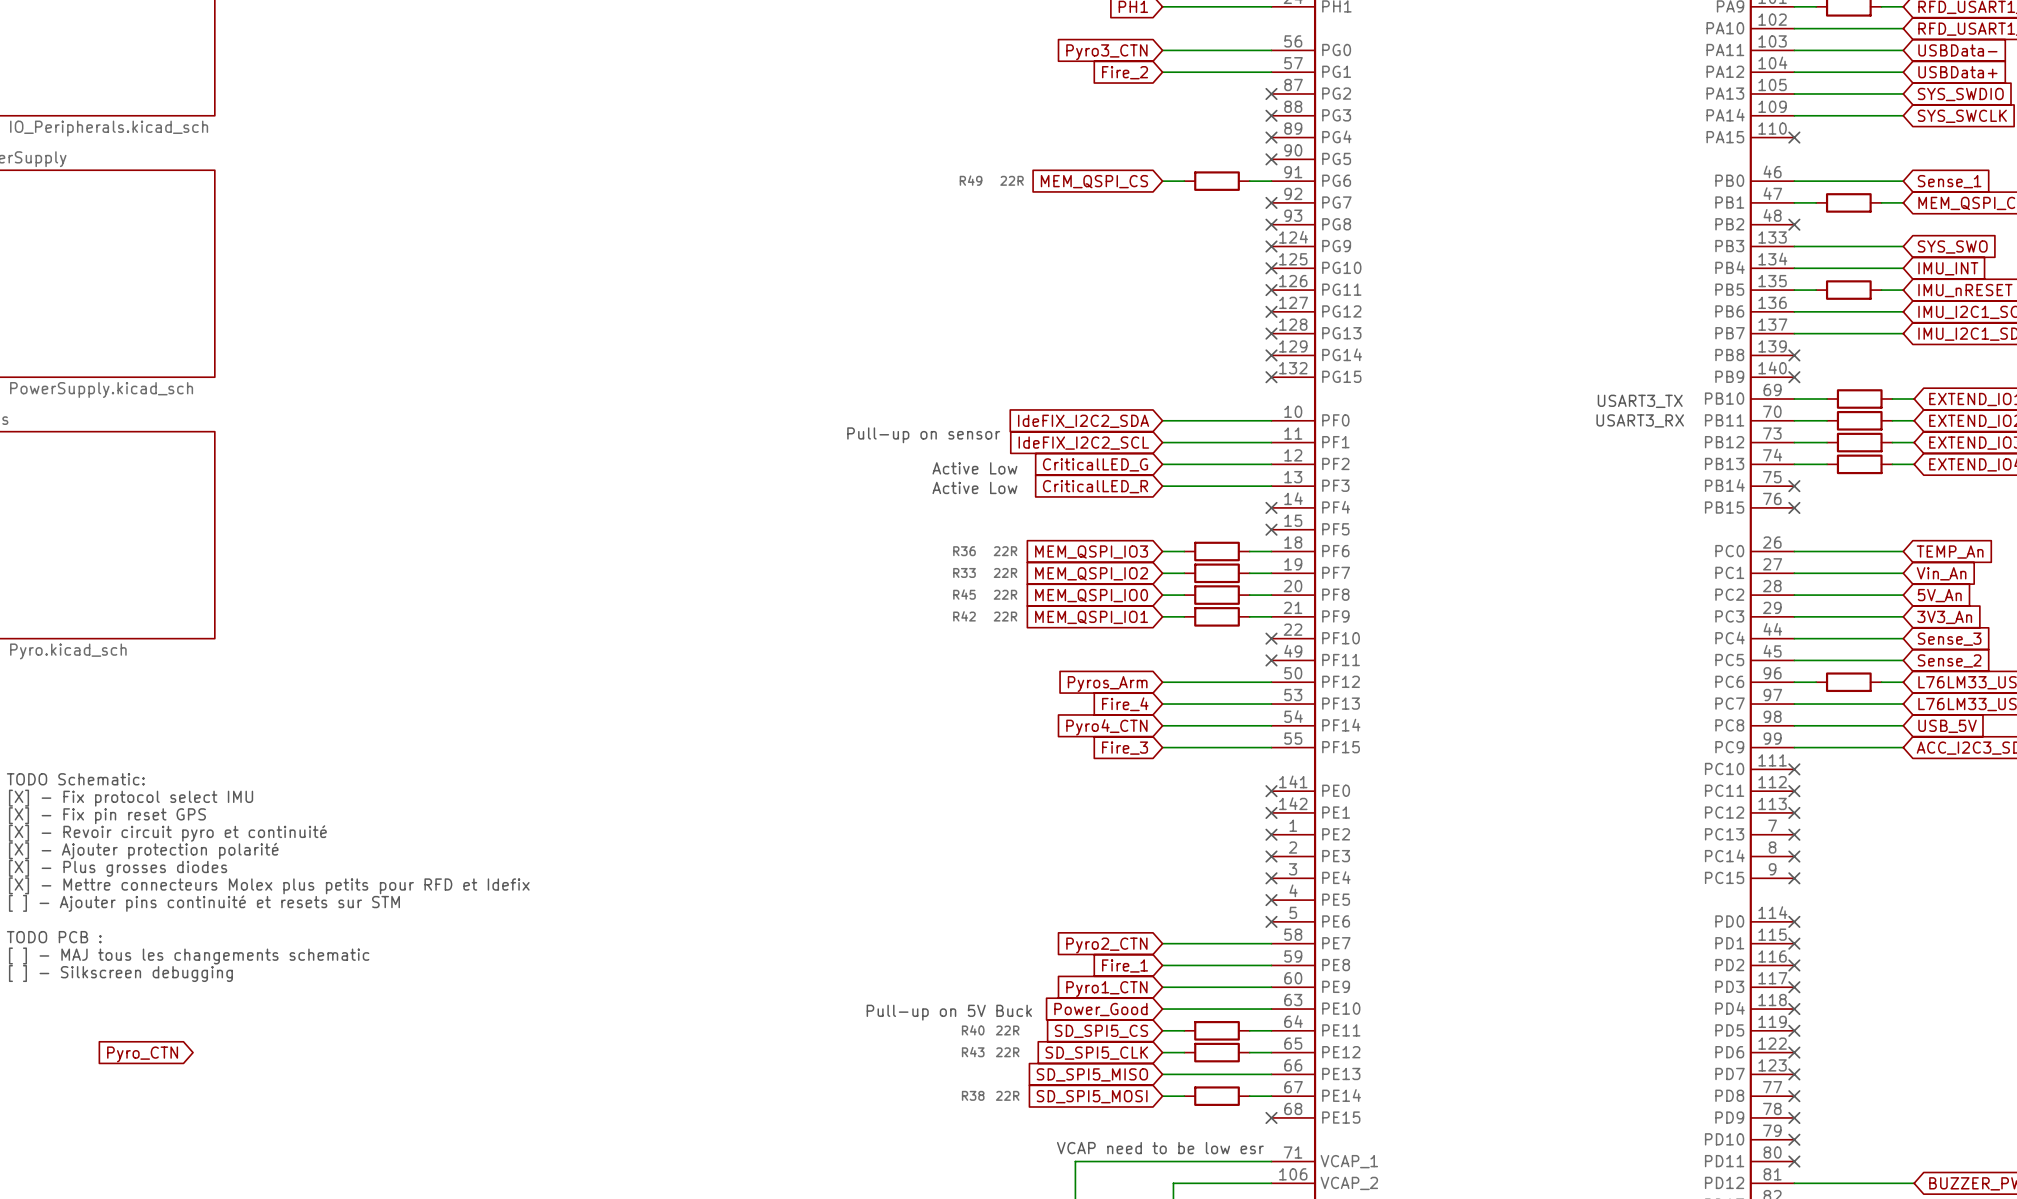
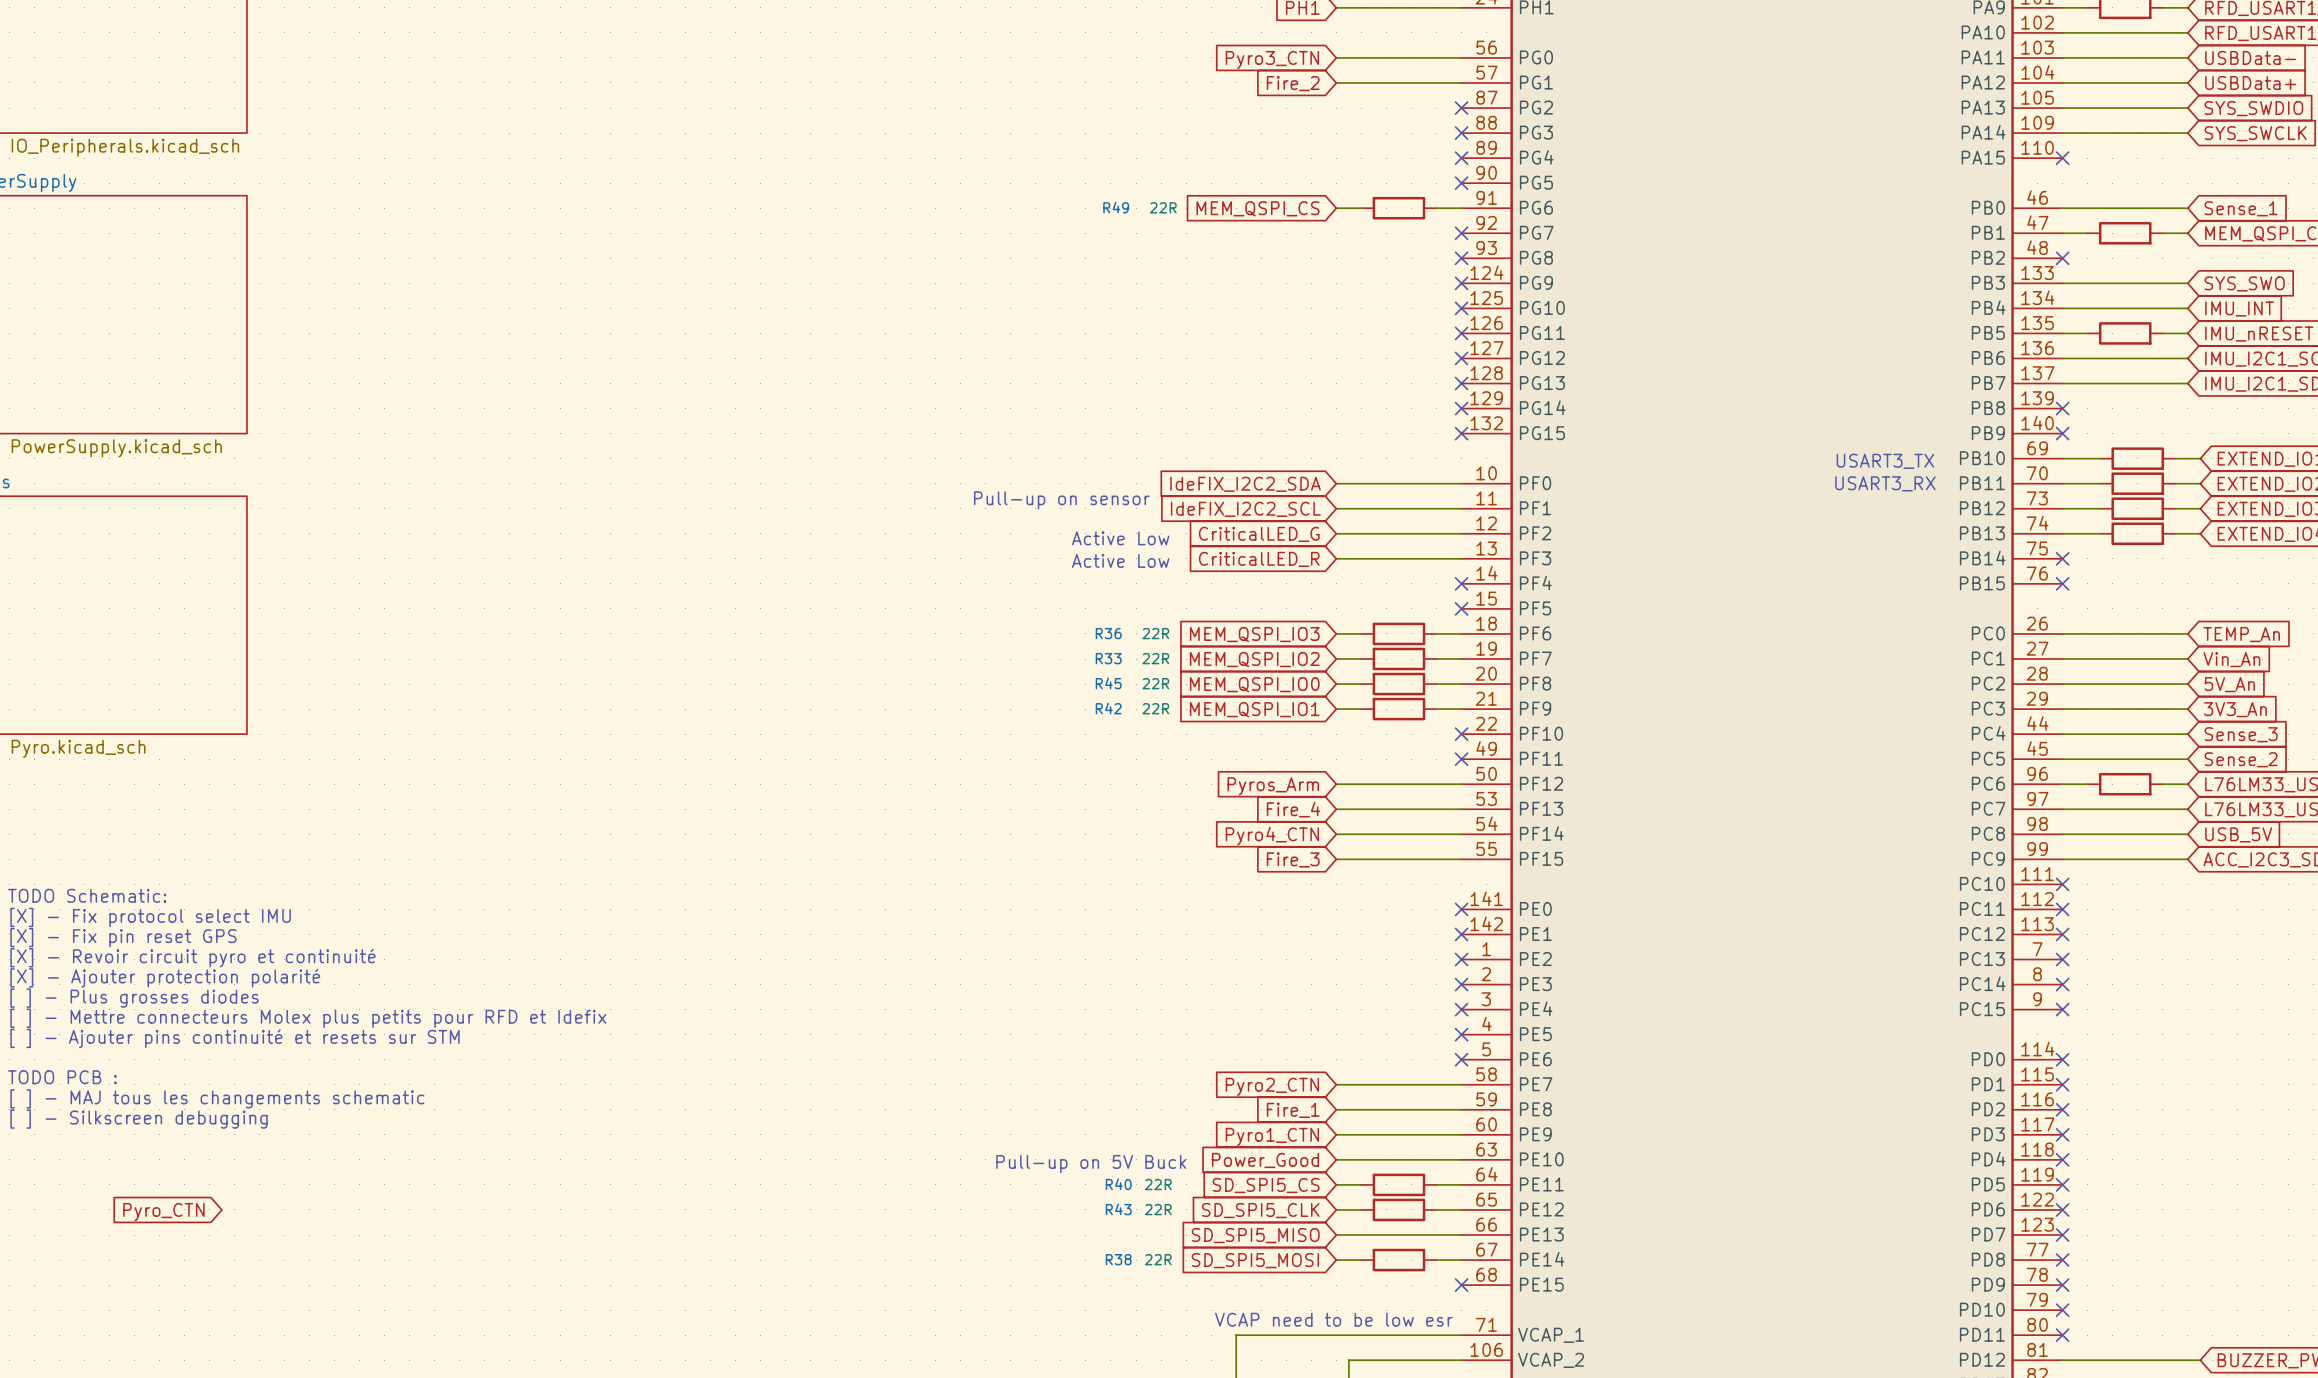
text: [X] - Plus grosses diodes (118, 868) -> [ ] - Plus grosses diodes (134, 998)
text: [X] - Mettre connecteurs Molex plus petits pour RFD et Idefix (269, 885) -> [ ] - Mettre connecteurs Molex plus petits pour RFD et Idefix (308, 1018)

